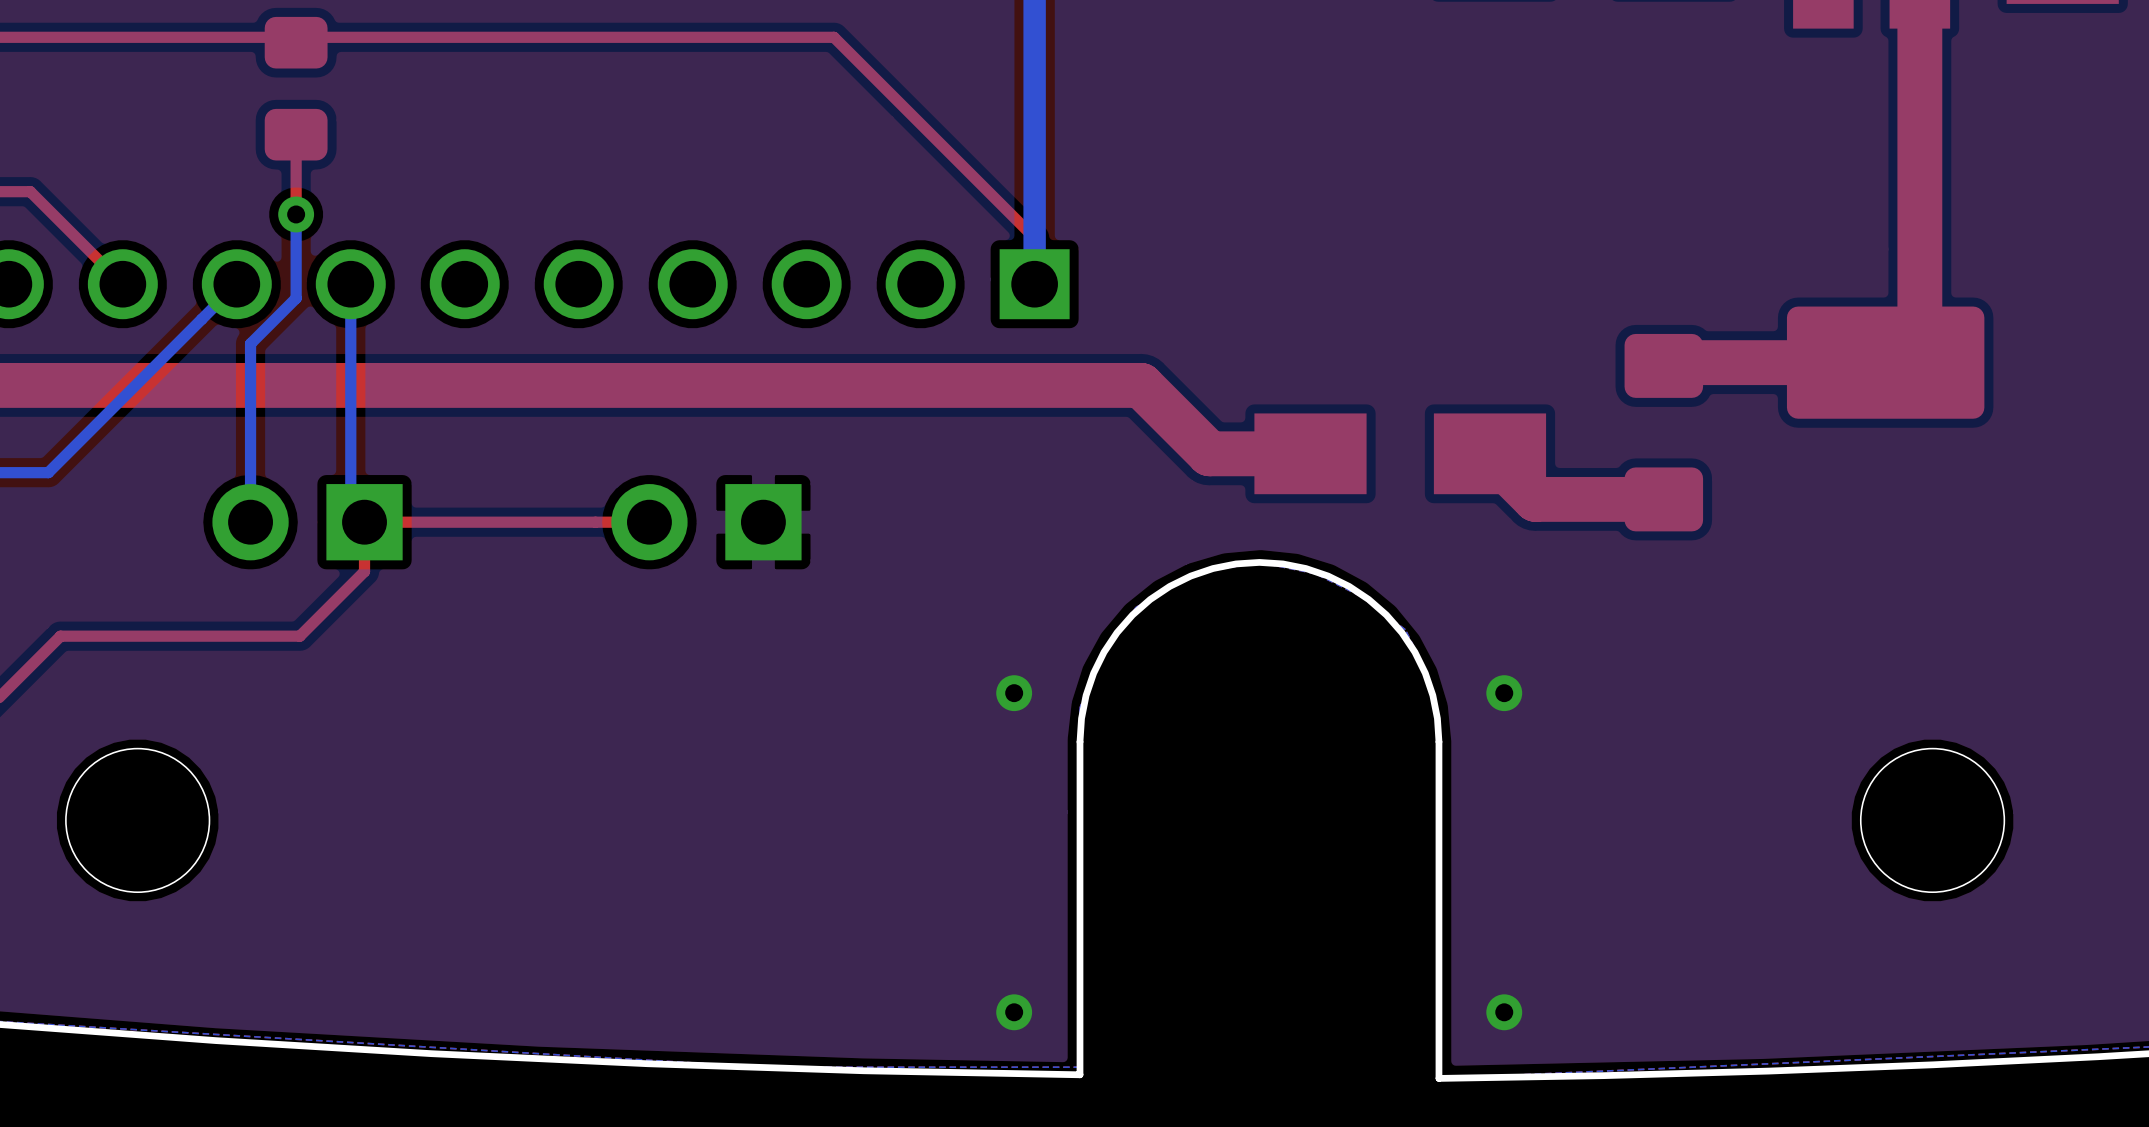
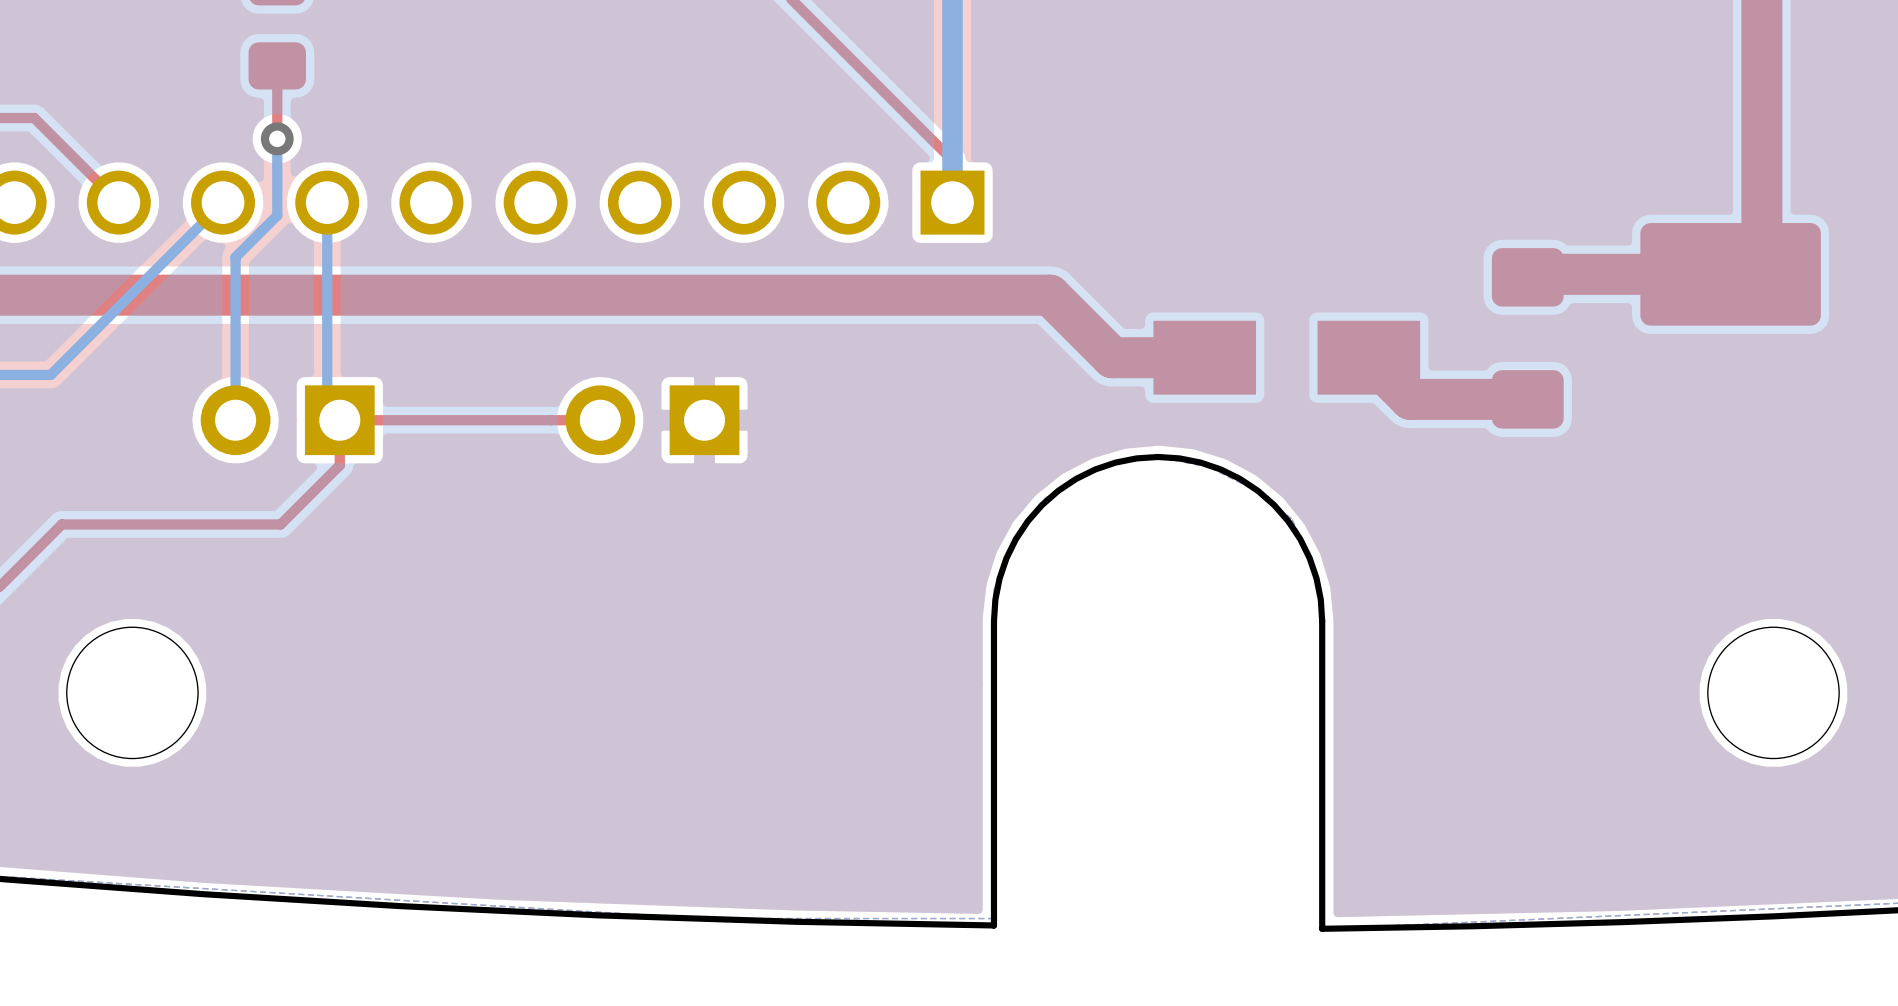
via: (1014, 693) -> none
via: (1504, 693) -> none
via: (1014, 1012) -> none
via: (1504, 1012) -> none

